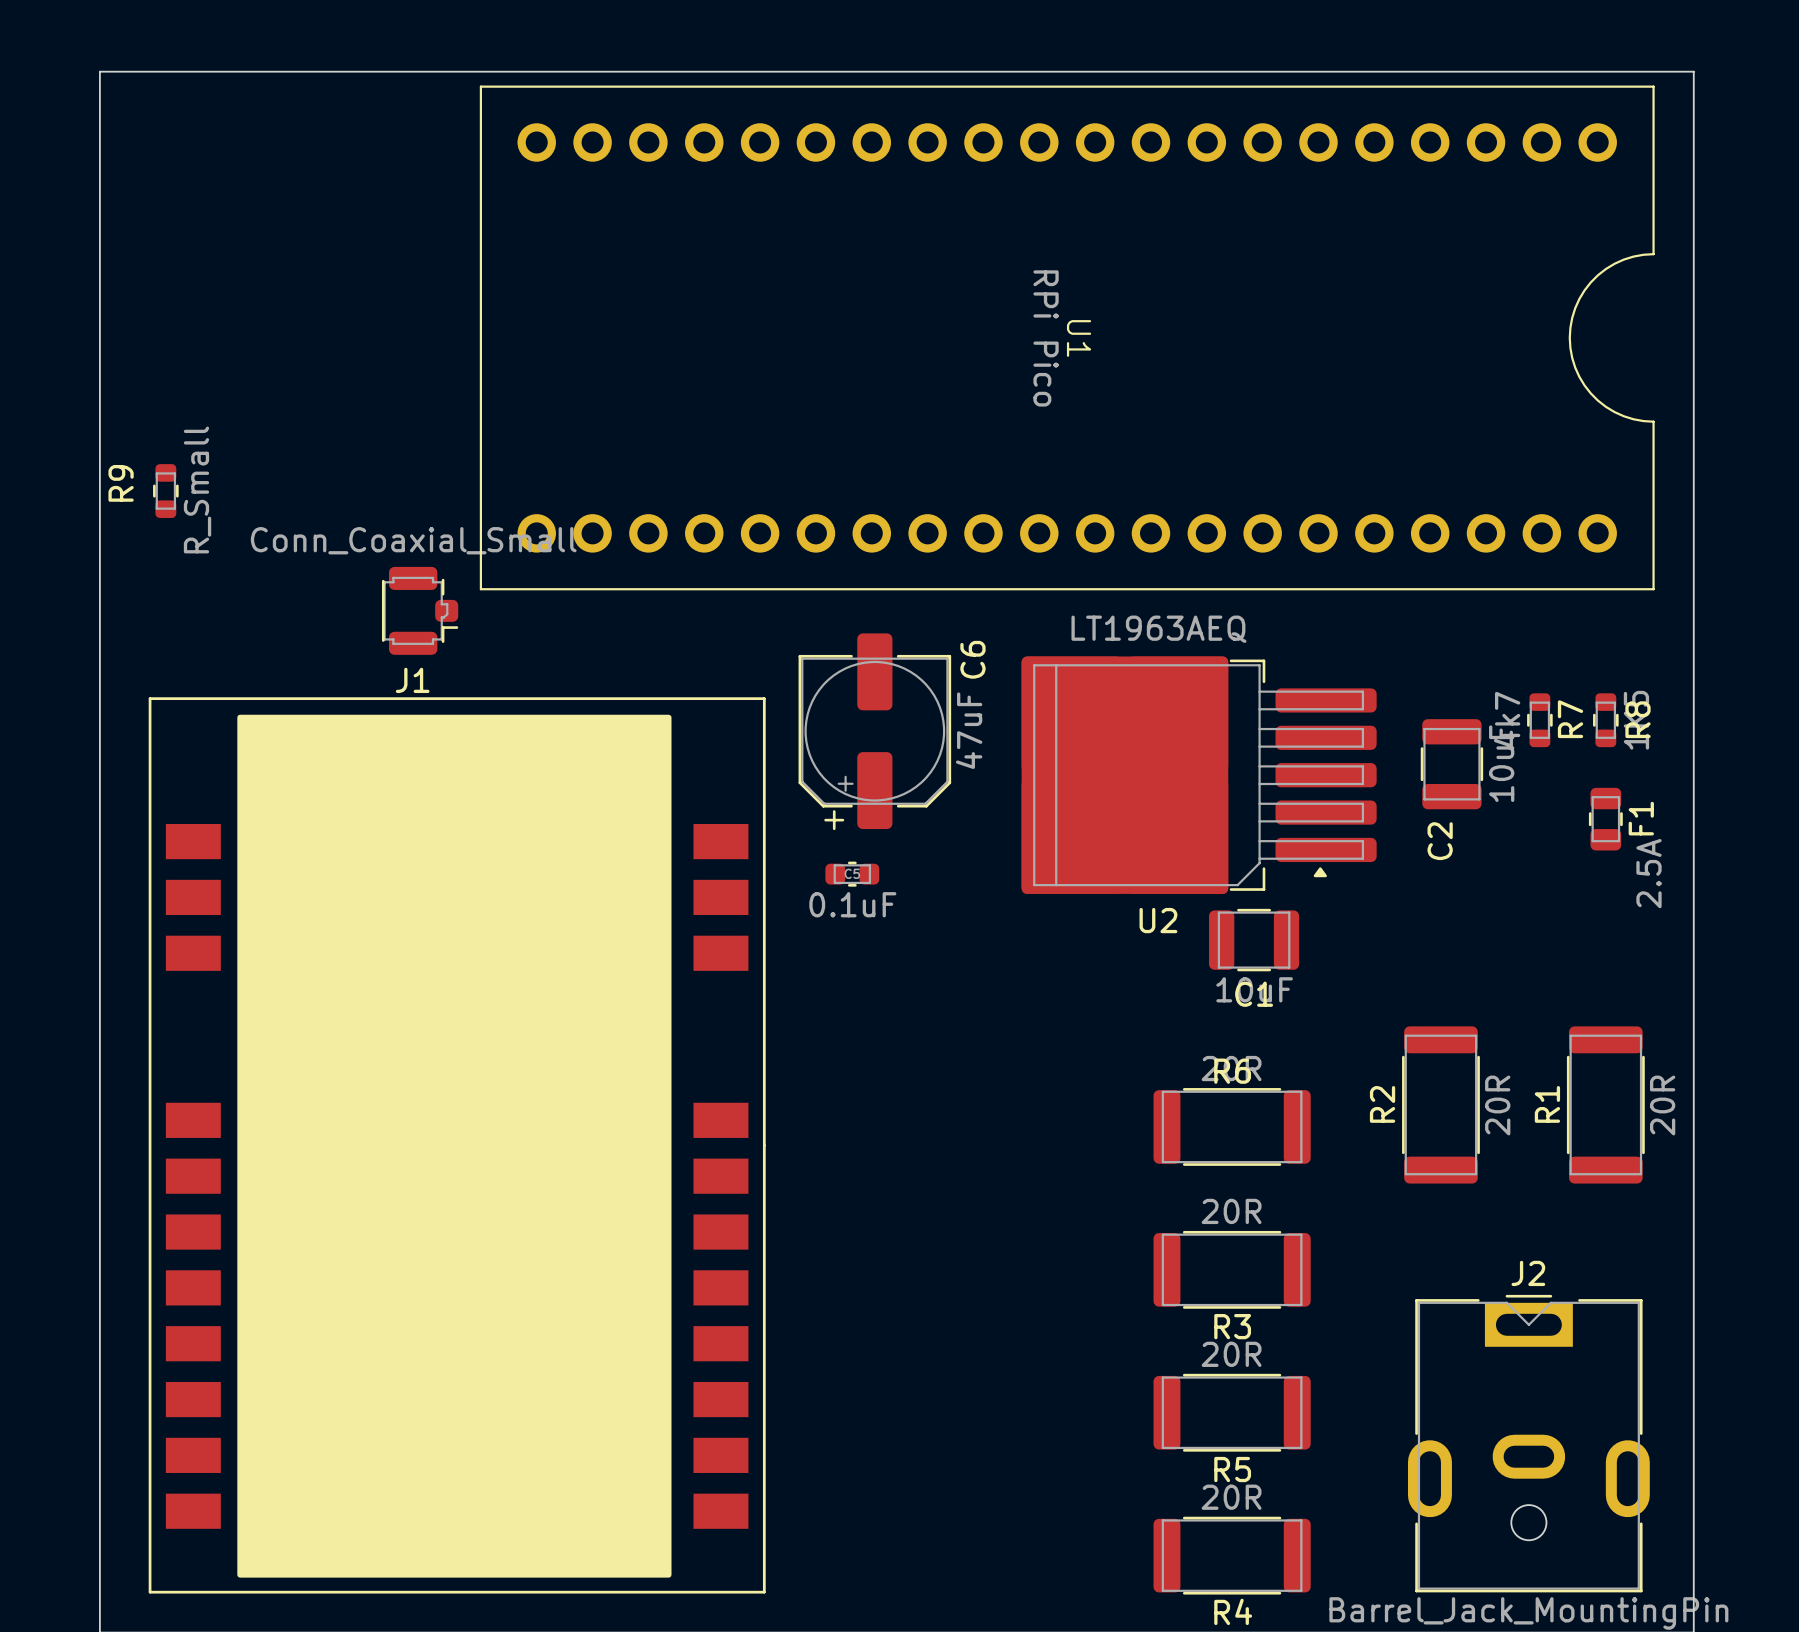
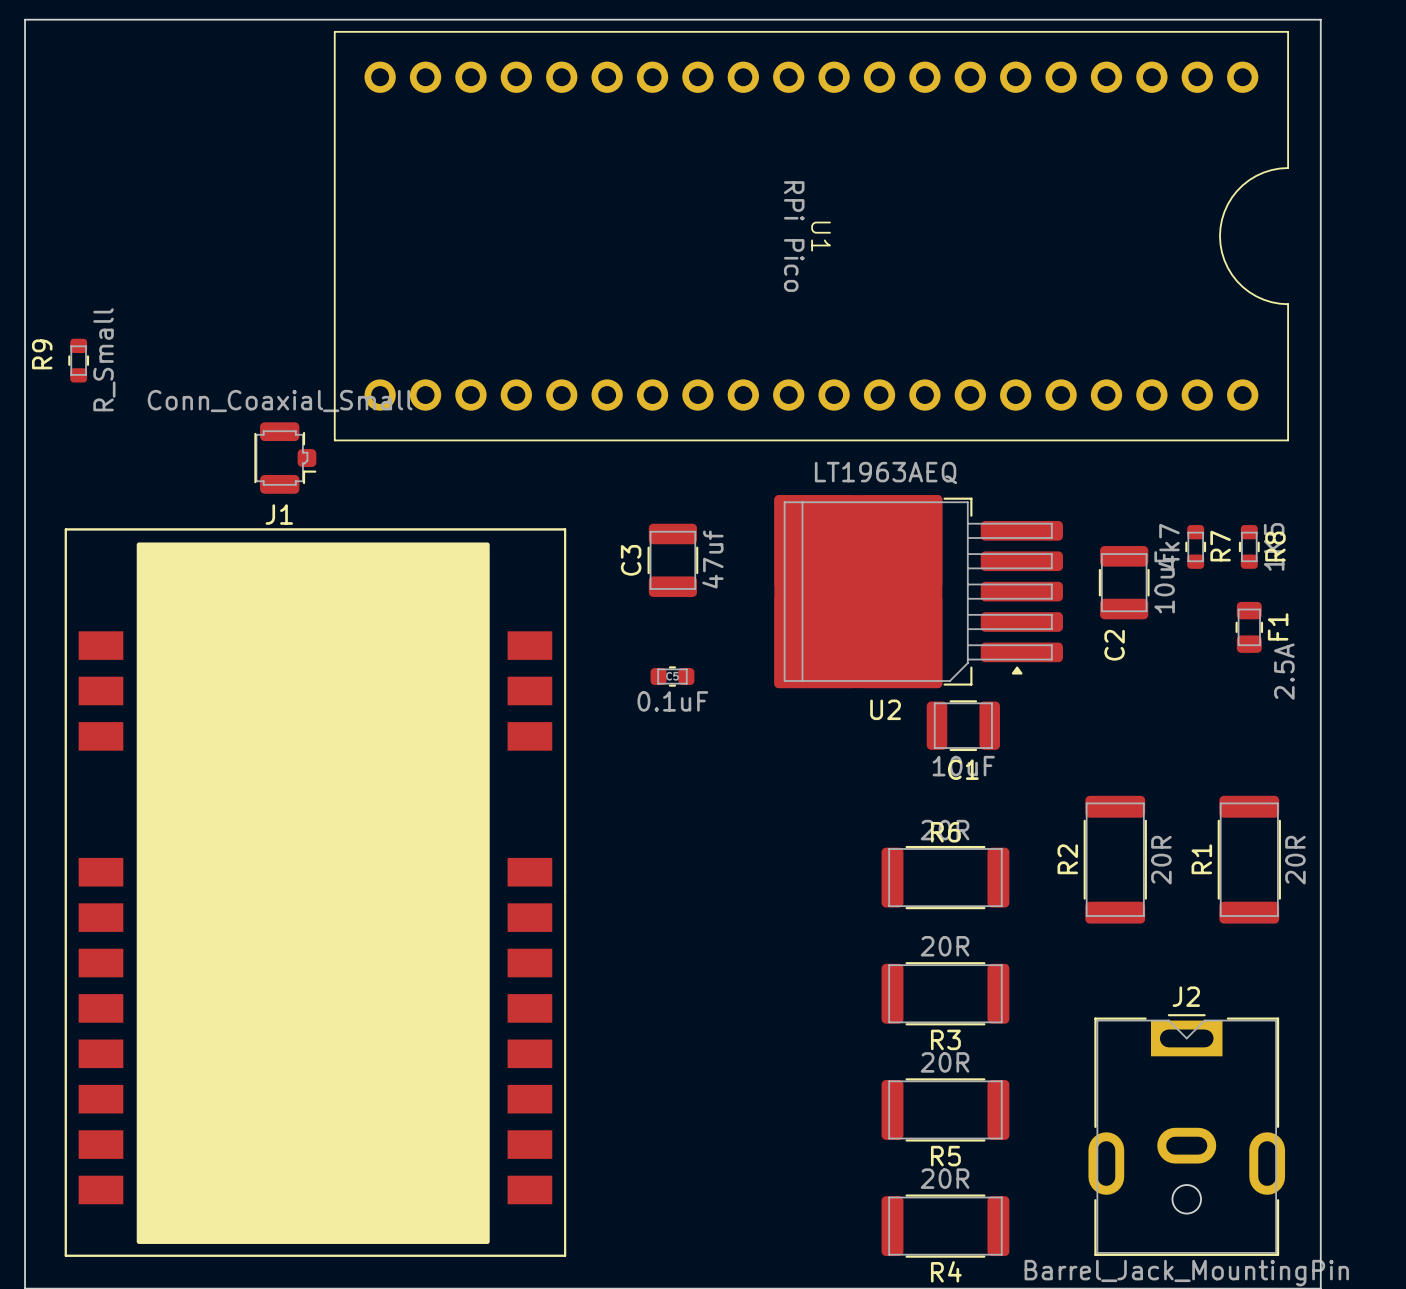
C6: 47uF (874, 731) -> none
C3: none -> 47uf (672, 560)
C5 position: (852, 874) -> (672, 676)

